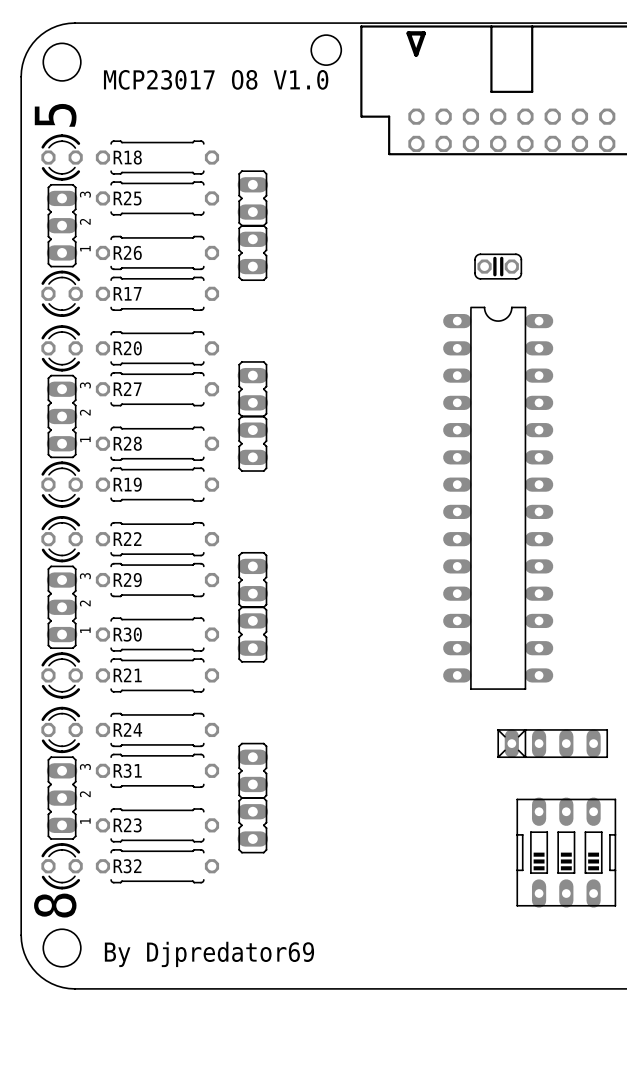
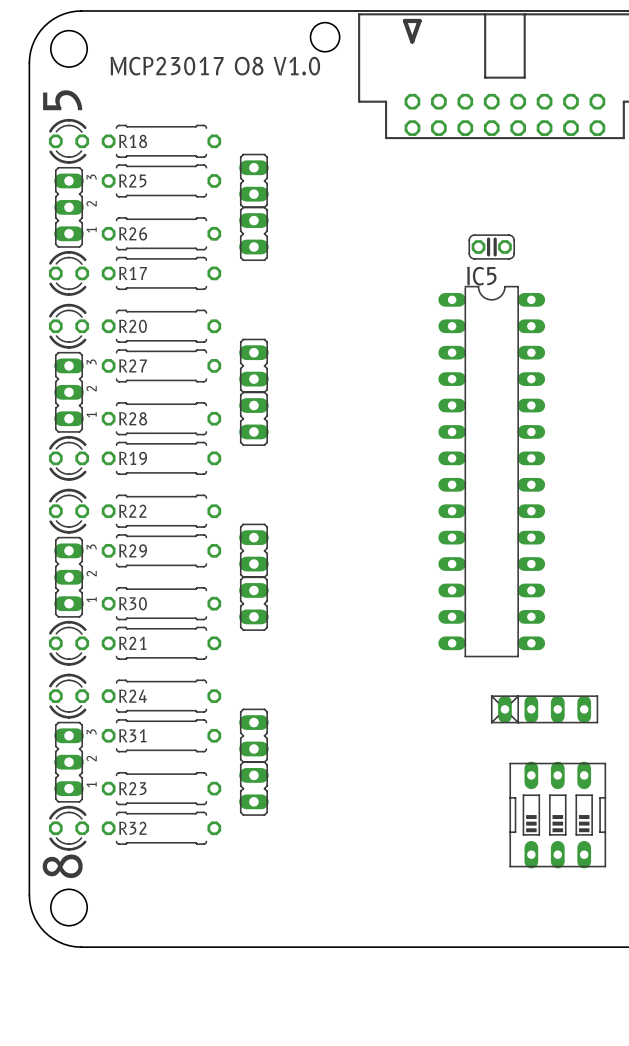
IC5 name: none -> IC5 (481, 276)
text: By Djpredator69 (209, 954) -> none

